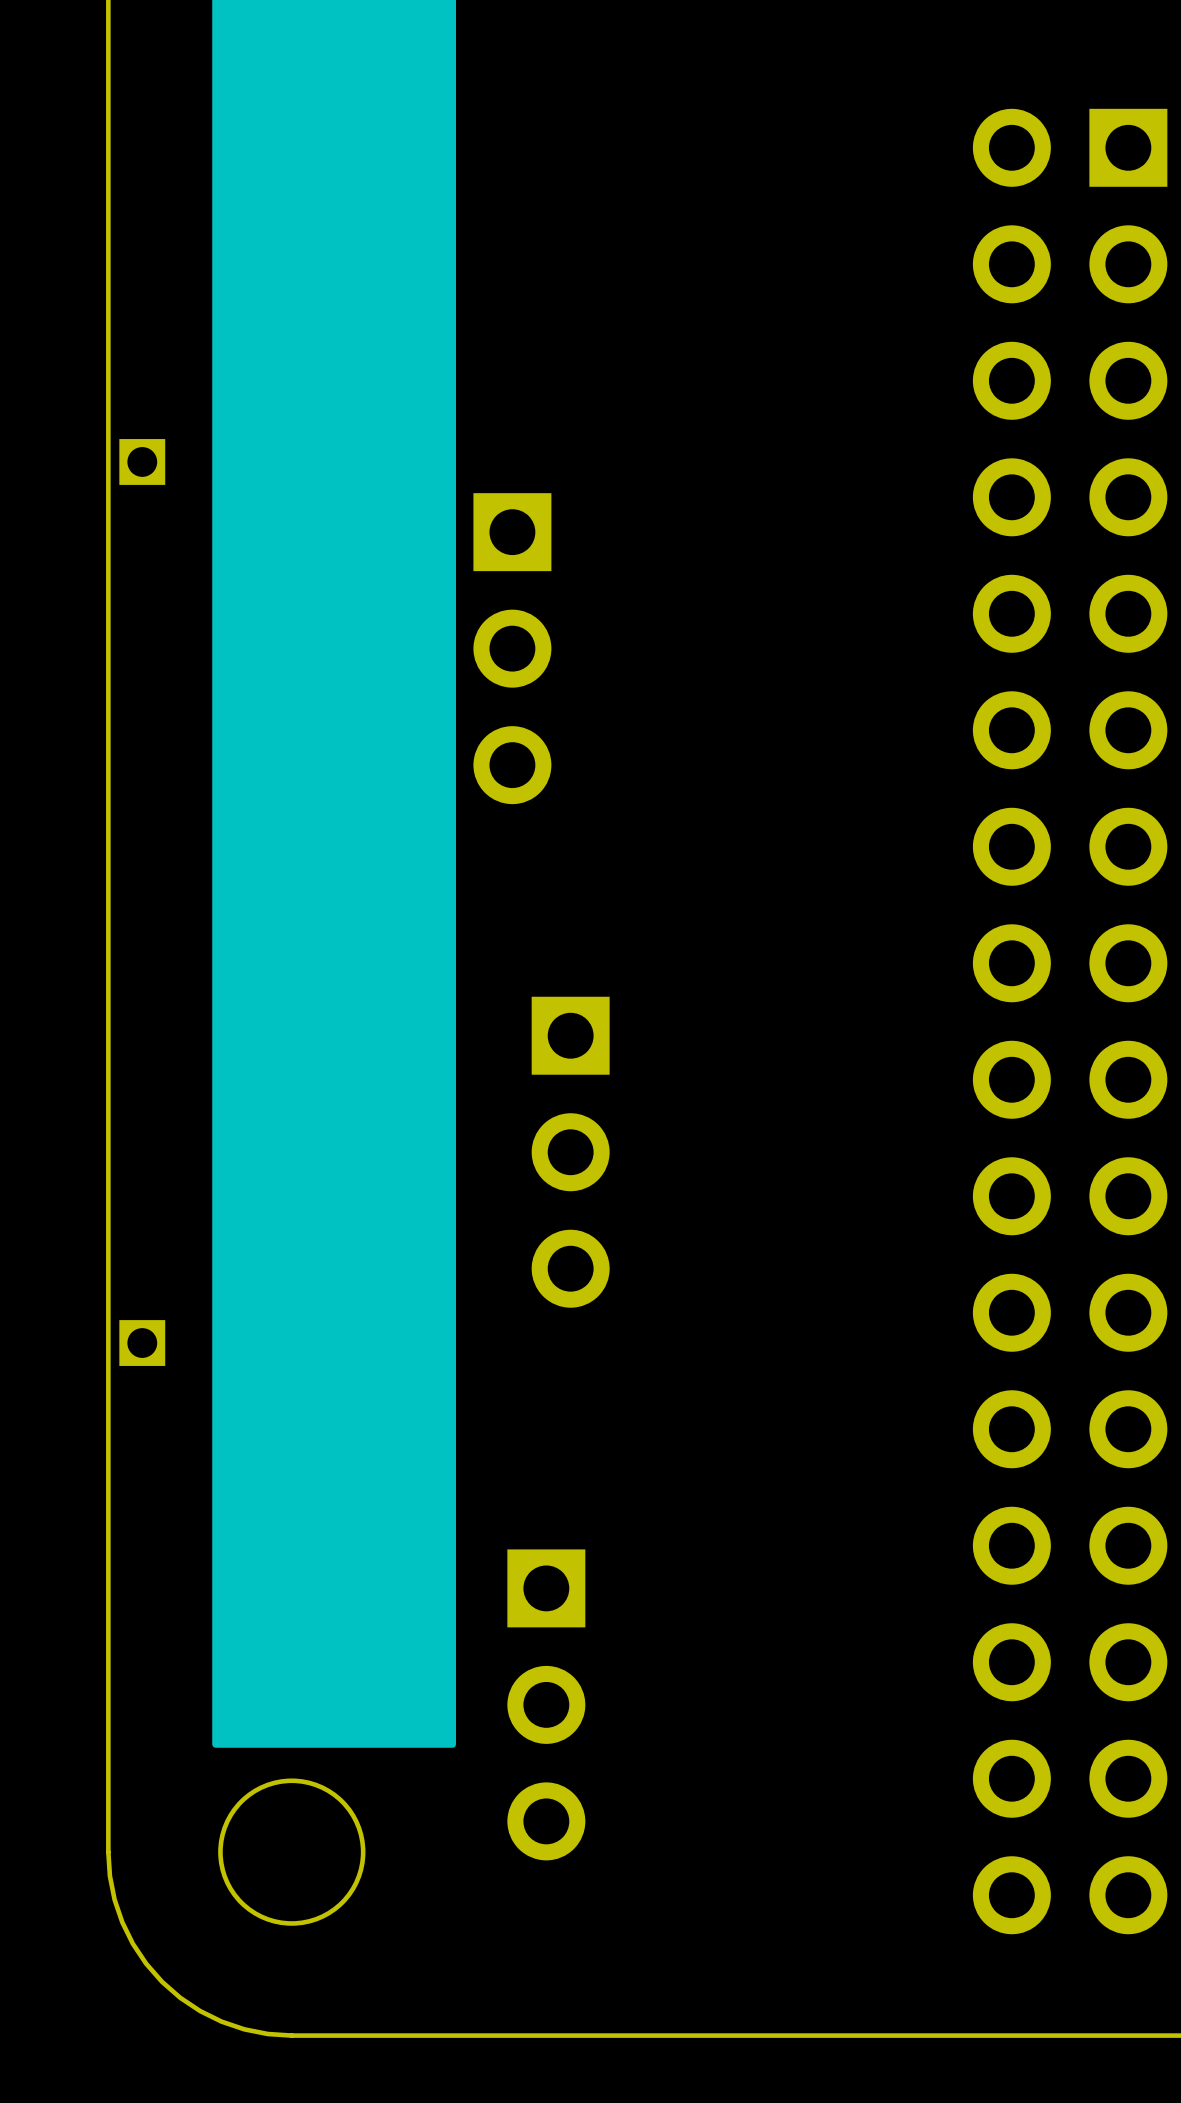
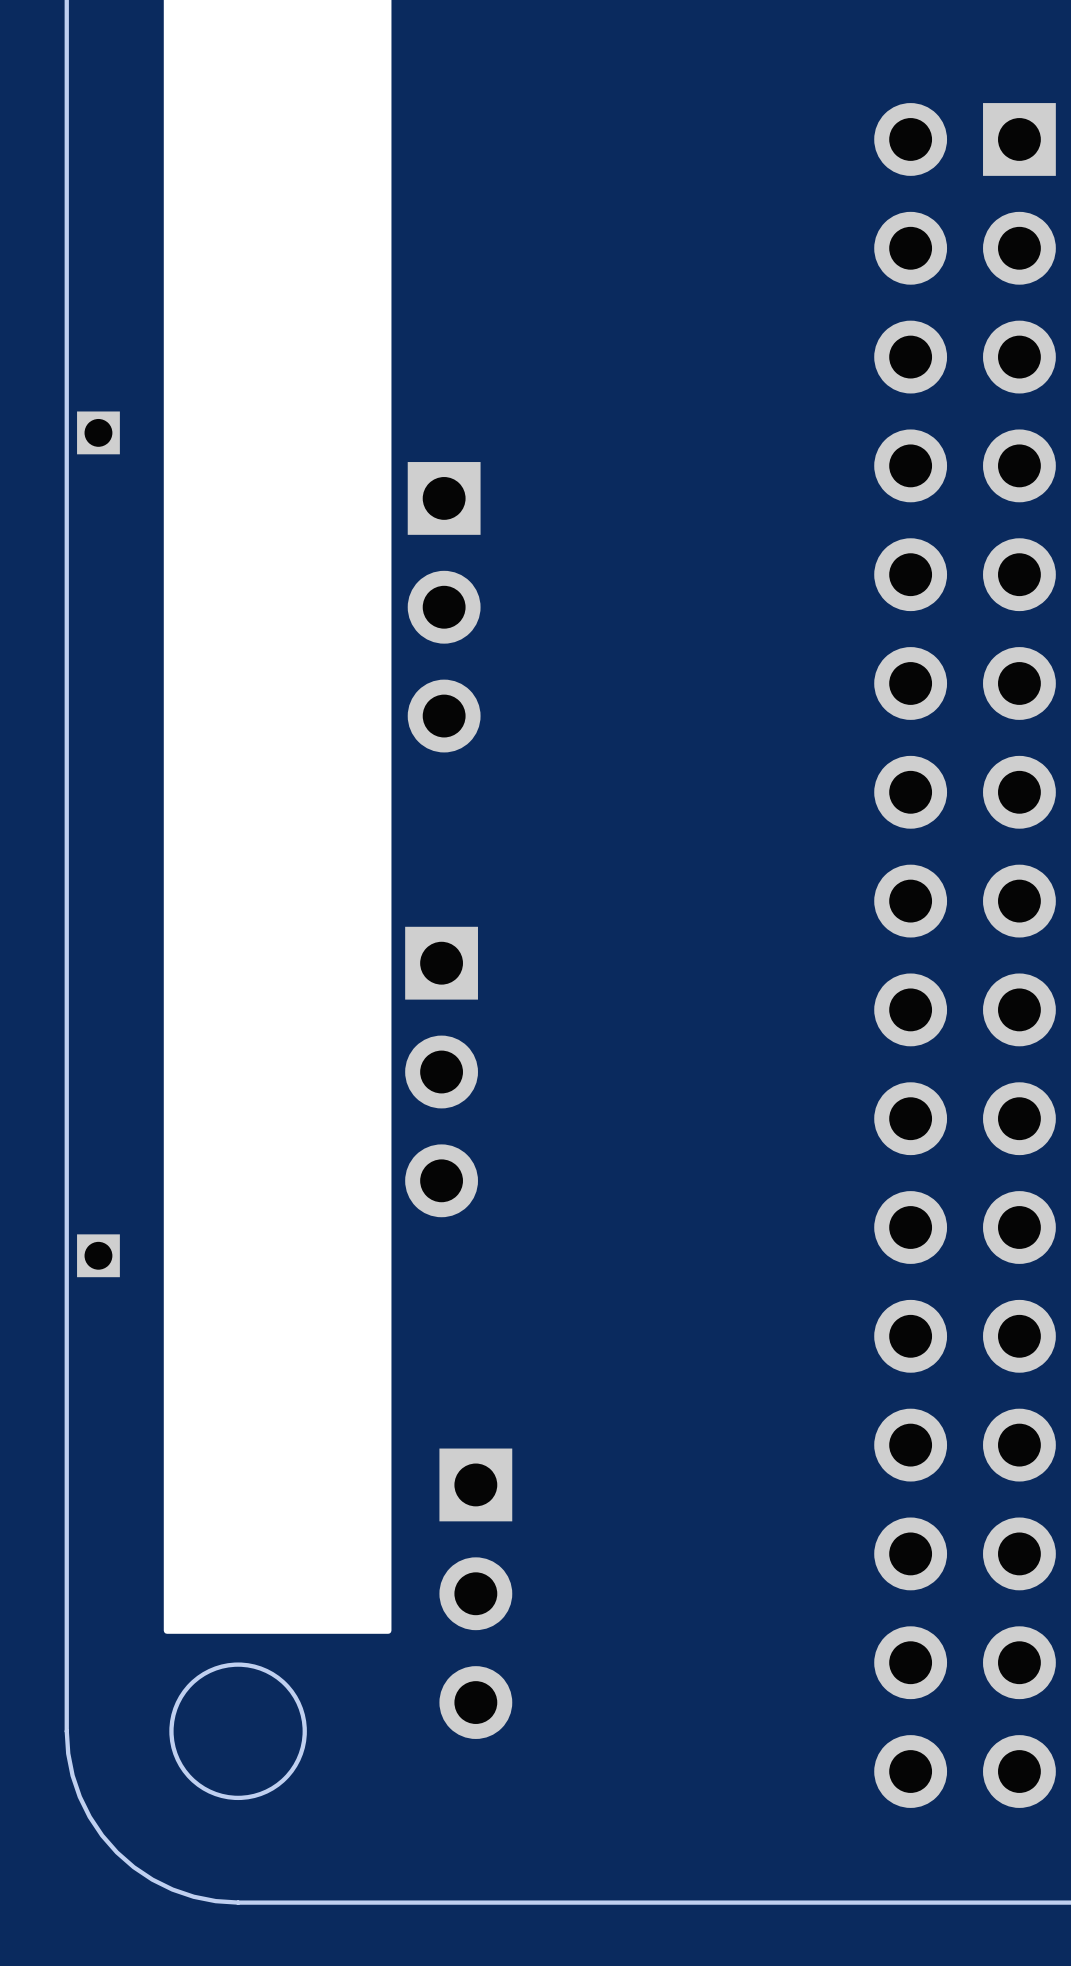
part position: (570, 1152) -> (441, 1072)

